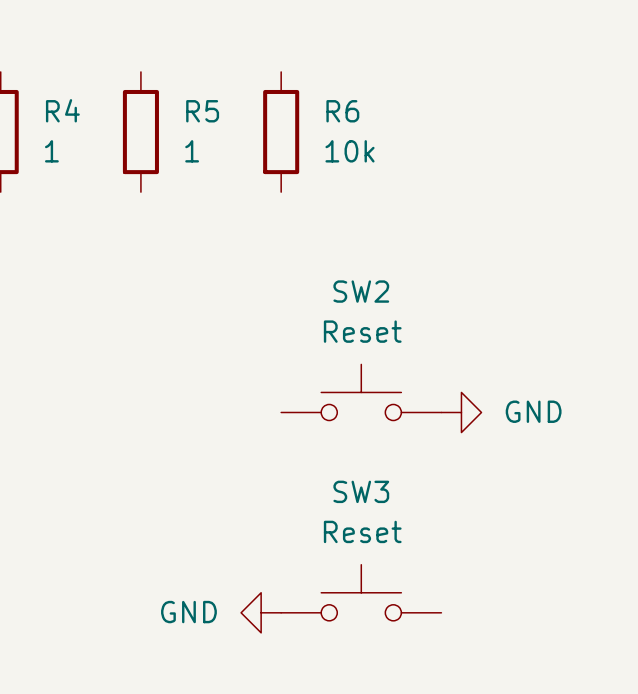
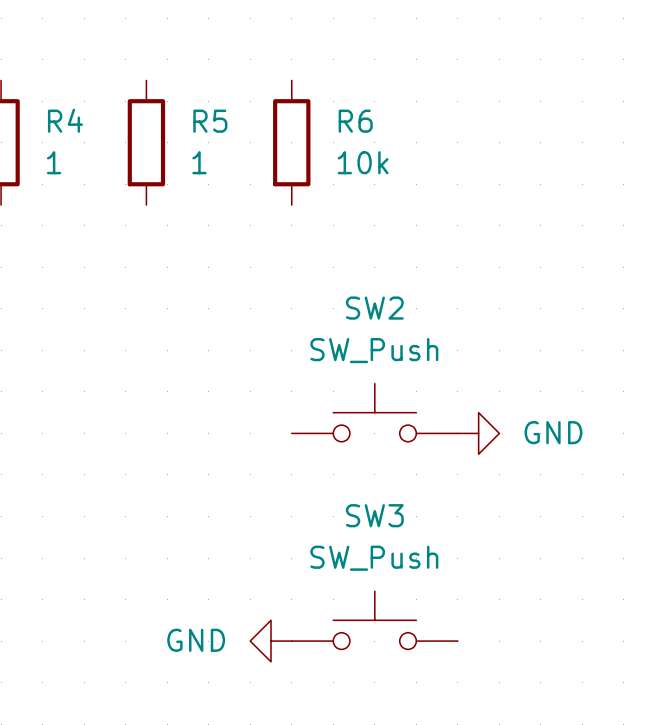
SW2 value: Reset (362, 331) -> SW_Push (374, 350)
SW3 value: Reset (362, 531) -> SW_Push (374, 558)

